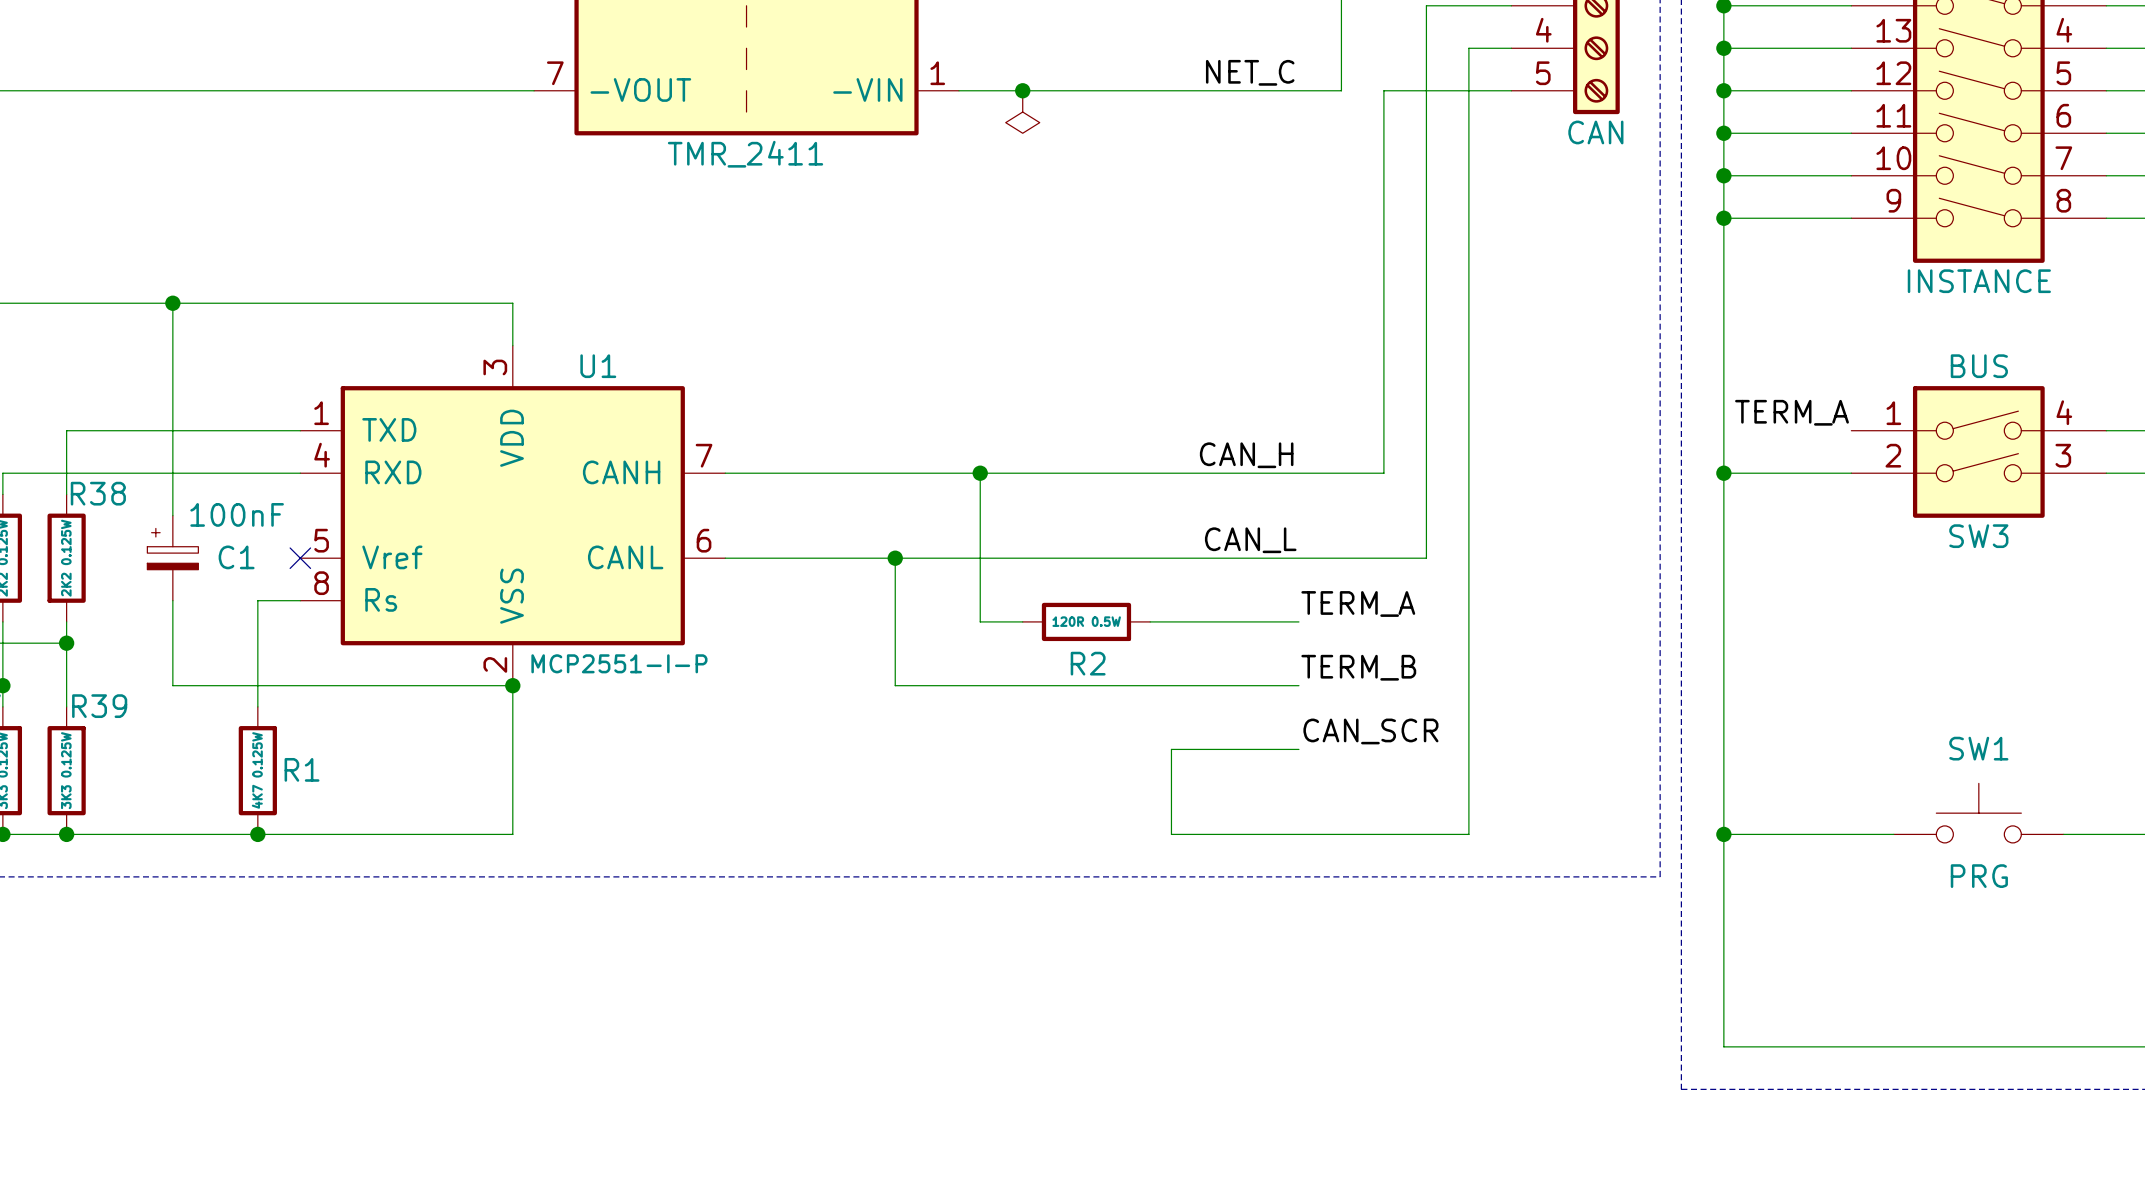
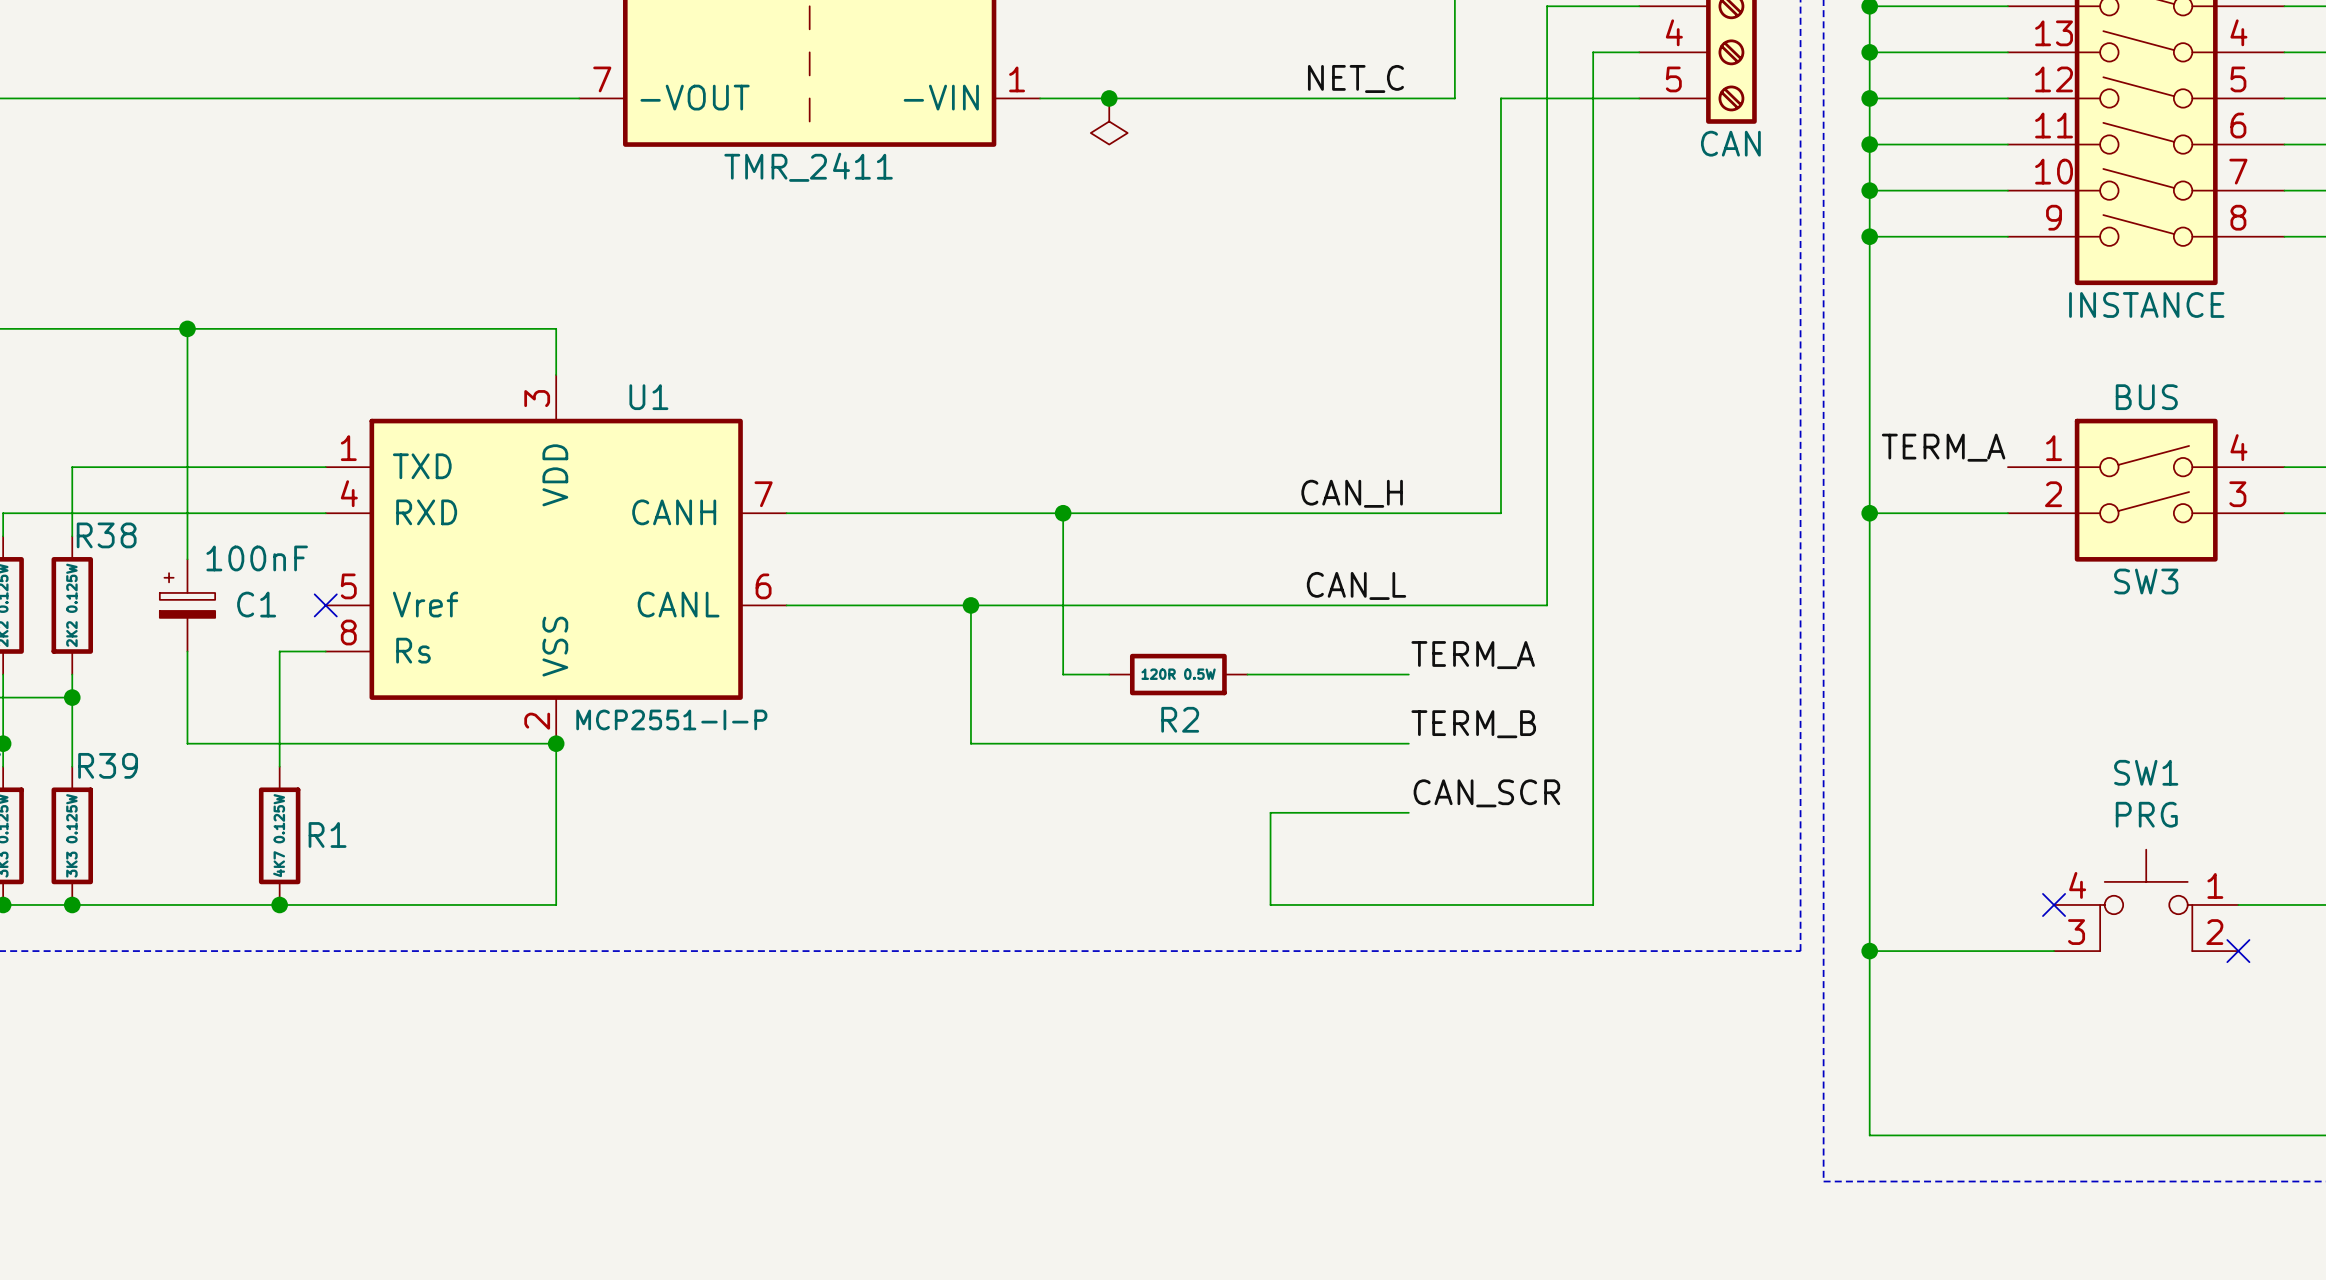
SW1 name position: SW1 (1978, 748) -> SW1 (2146, 772)
SW1 symbol: [1893, 783, 2064, 843] -> [2054, 849, 2239, 952]
wire: (1723, 834) (1893, 834) -> (1869, 951) (2054, 951)
junction position: (1723, 834) -> (1869, 951)
no-connect mark: none -> (2054, 904)
SW1 value position: PRG (1979, 876) -> PRG (2146, 814)
no-connect mark: none -> (2238, 951)

